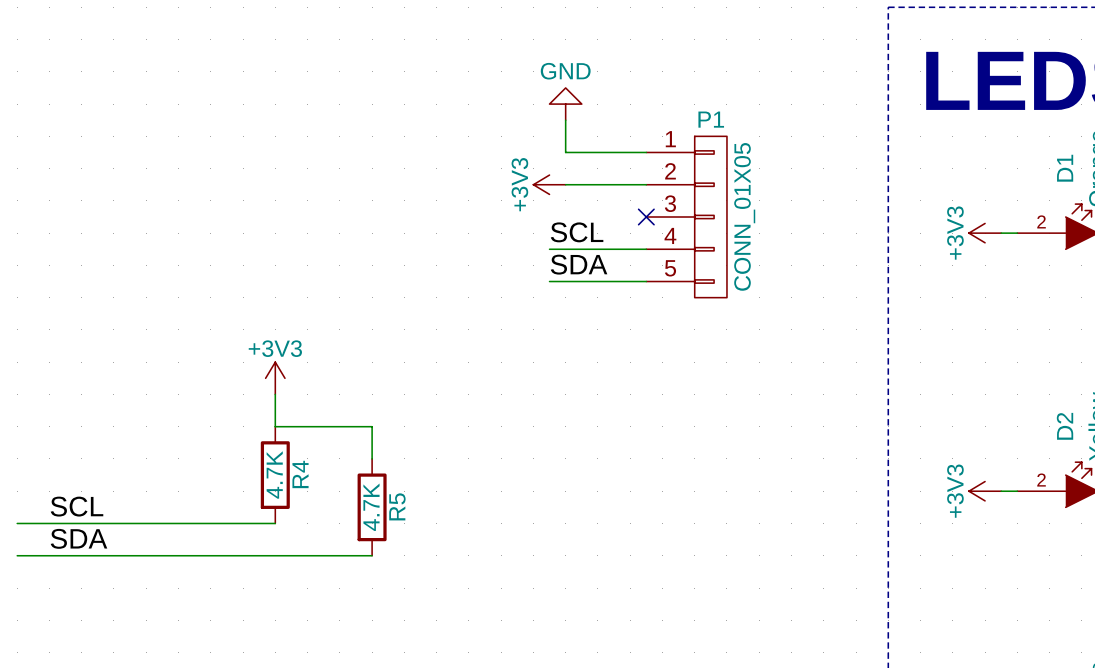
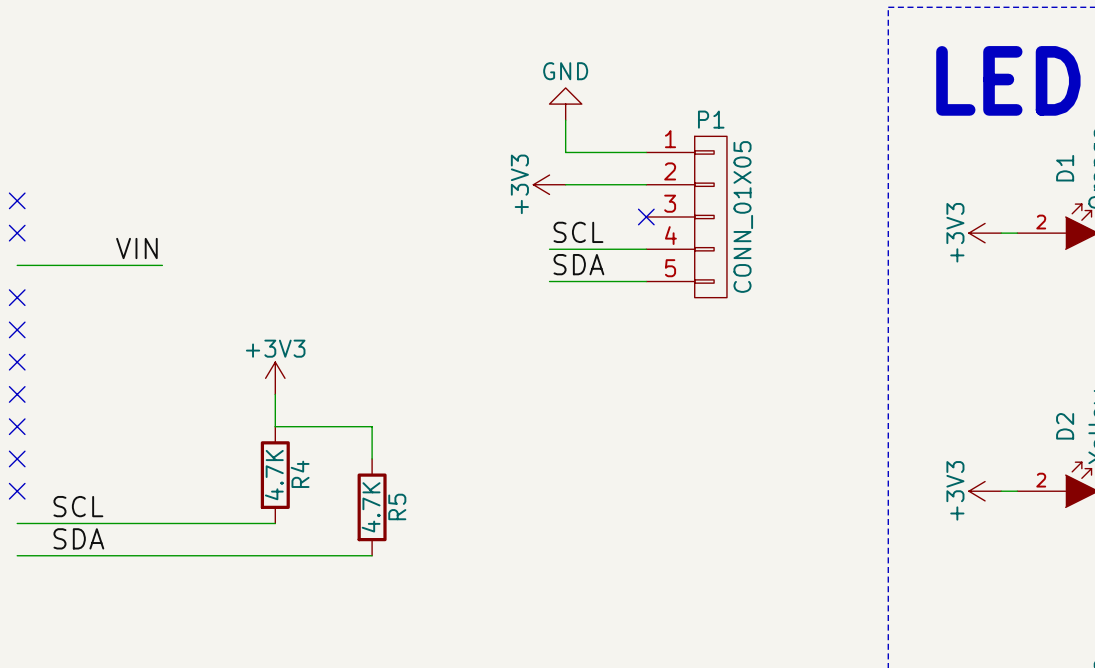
no-connect mark: none -> (17, 200)
no-connect mark: none -> (17, 233)
label: none -> VIN (136, 248)
wire: none -> (17, 265) (162, 265)
no-connect mark: none -> (17, 297)
no-connect mark: none -> (17, 329)
no-connect mark: none -> (17, 362)
no-connect mark: none -> (17, 394)
no-connect mark: none -> (17, 426)
no-connect mark: none -> (17, 458)
no-connect mark: none -> (17, 491)

